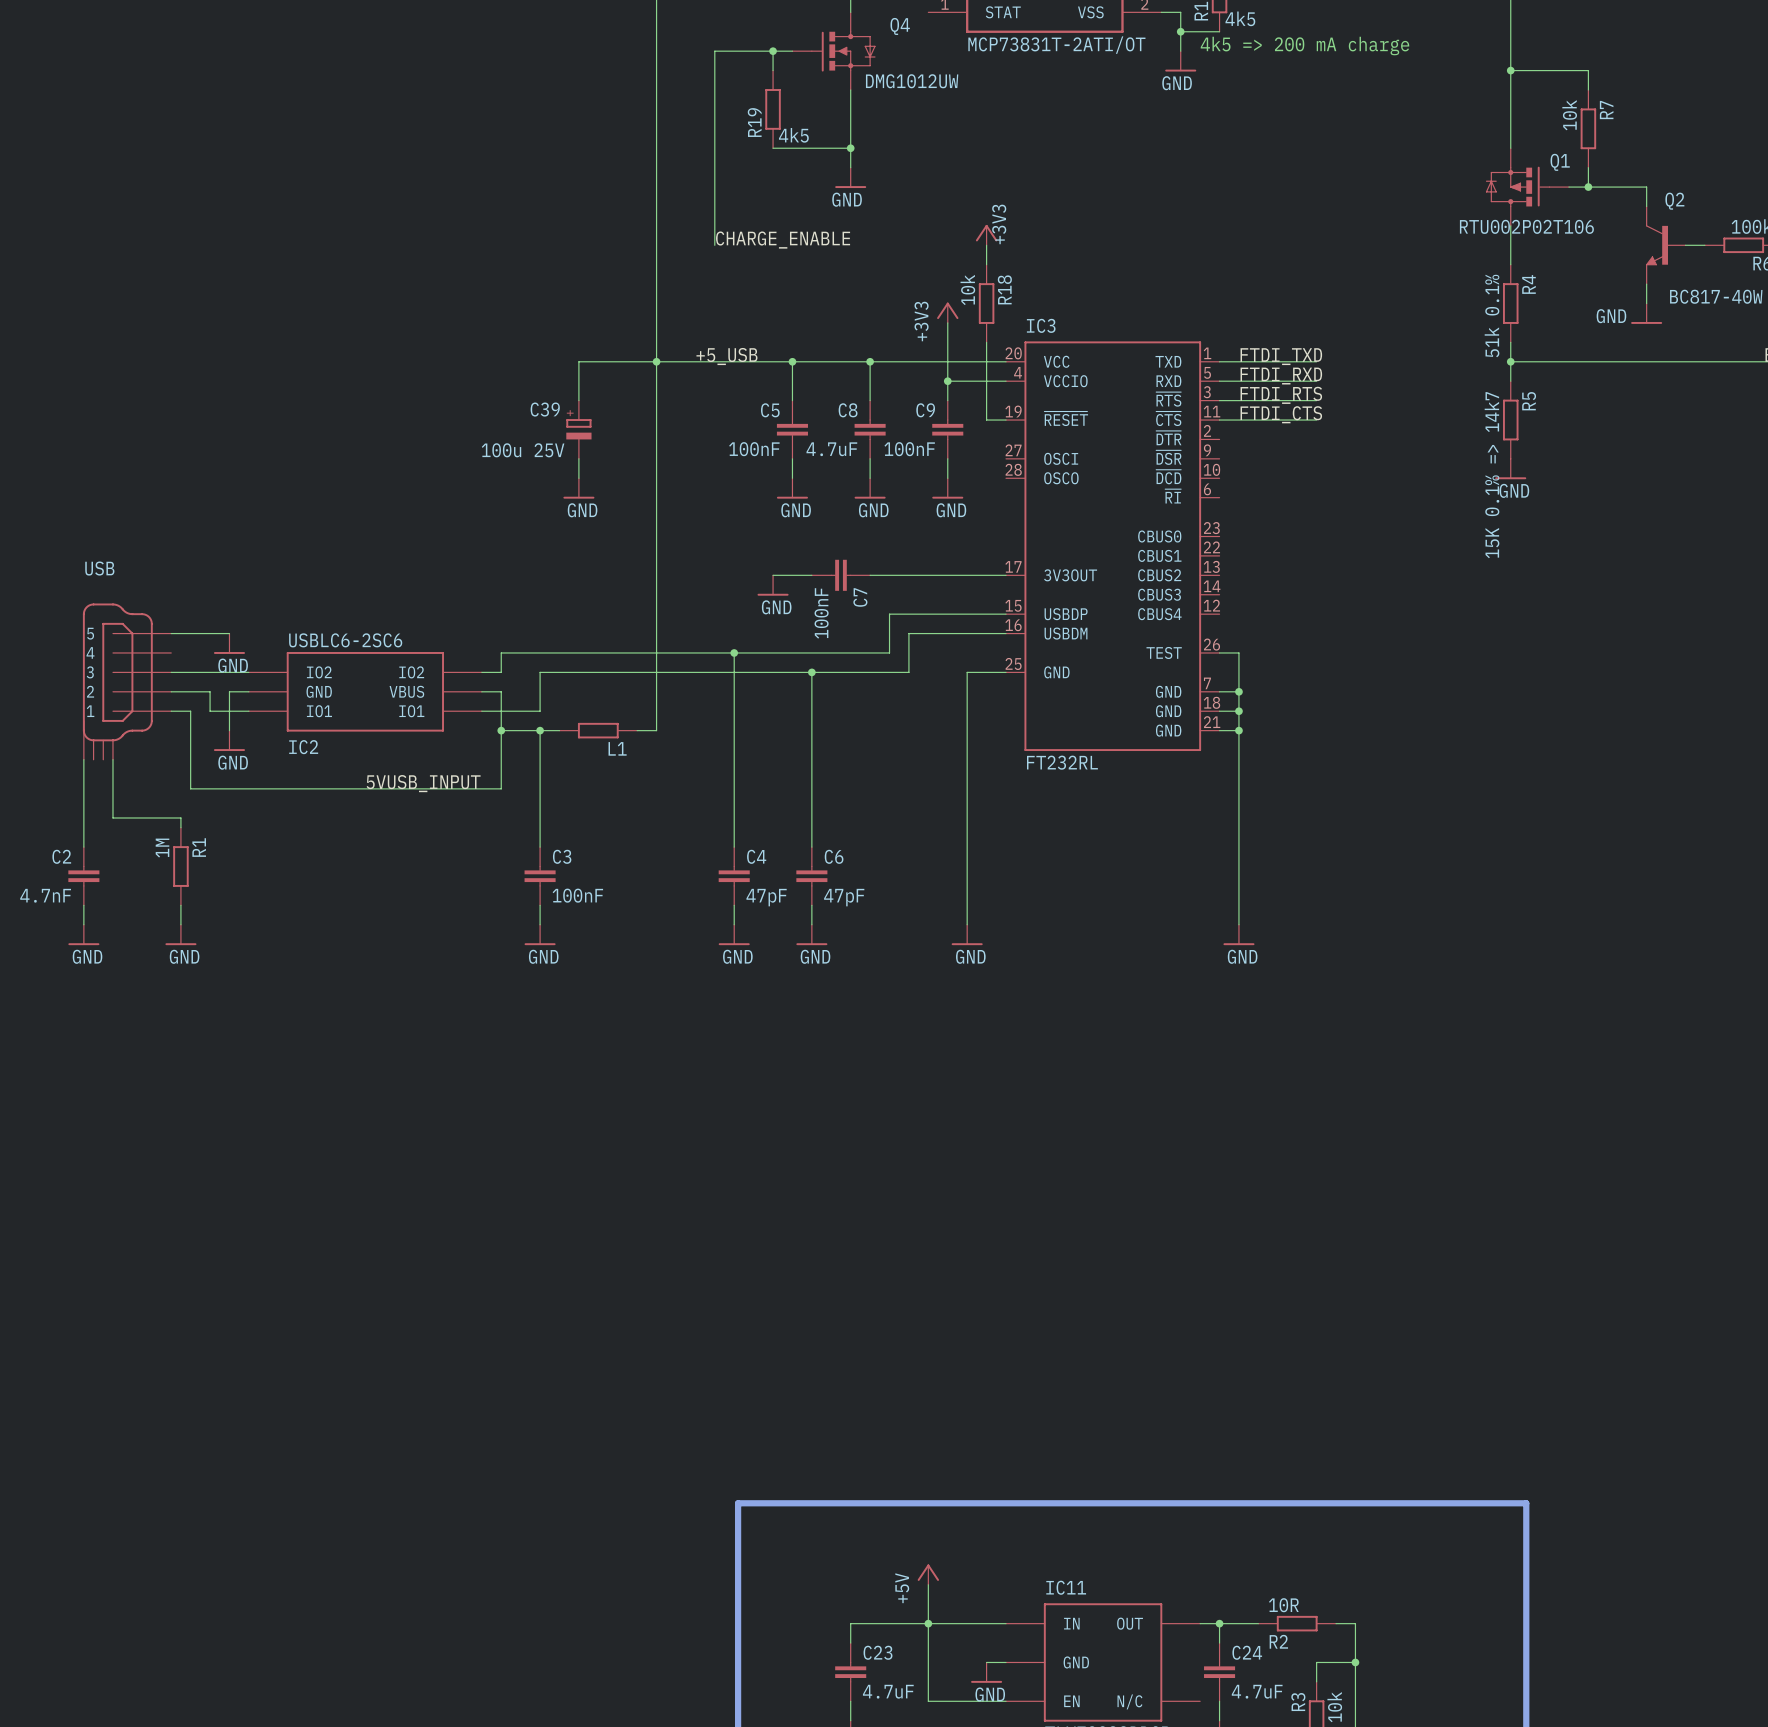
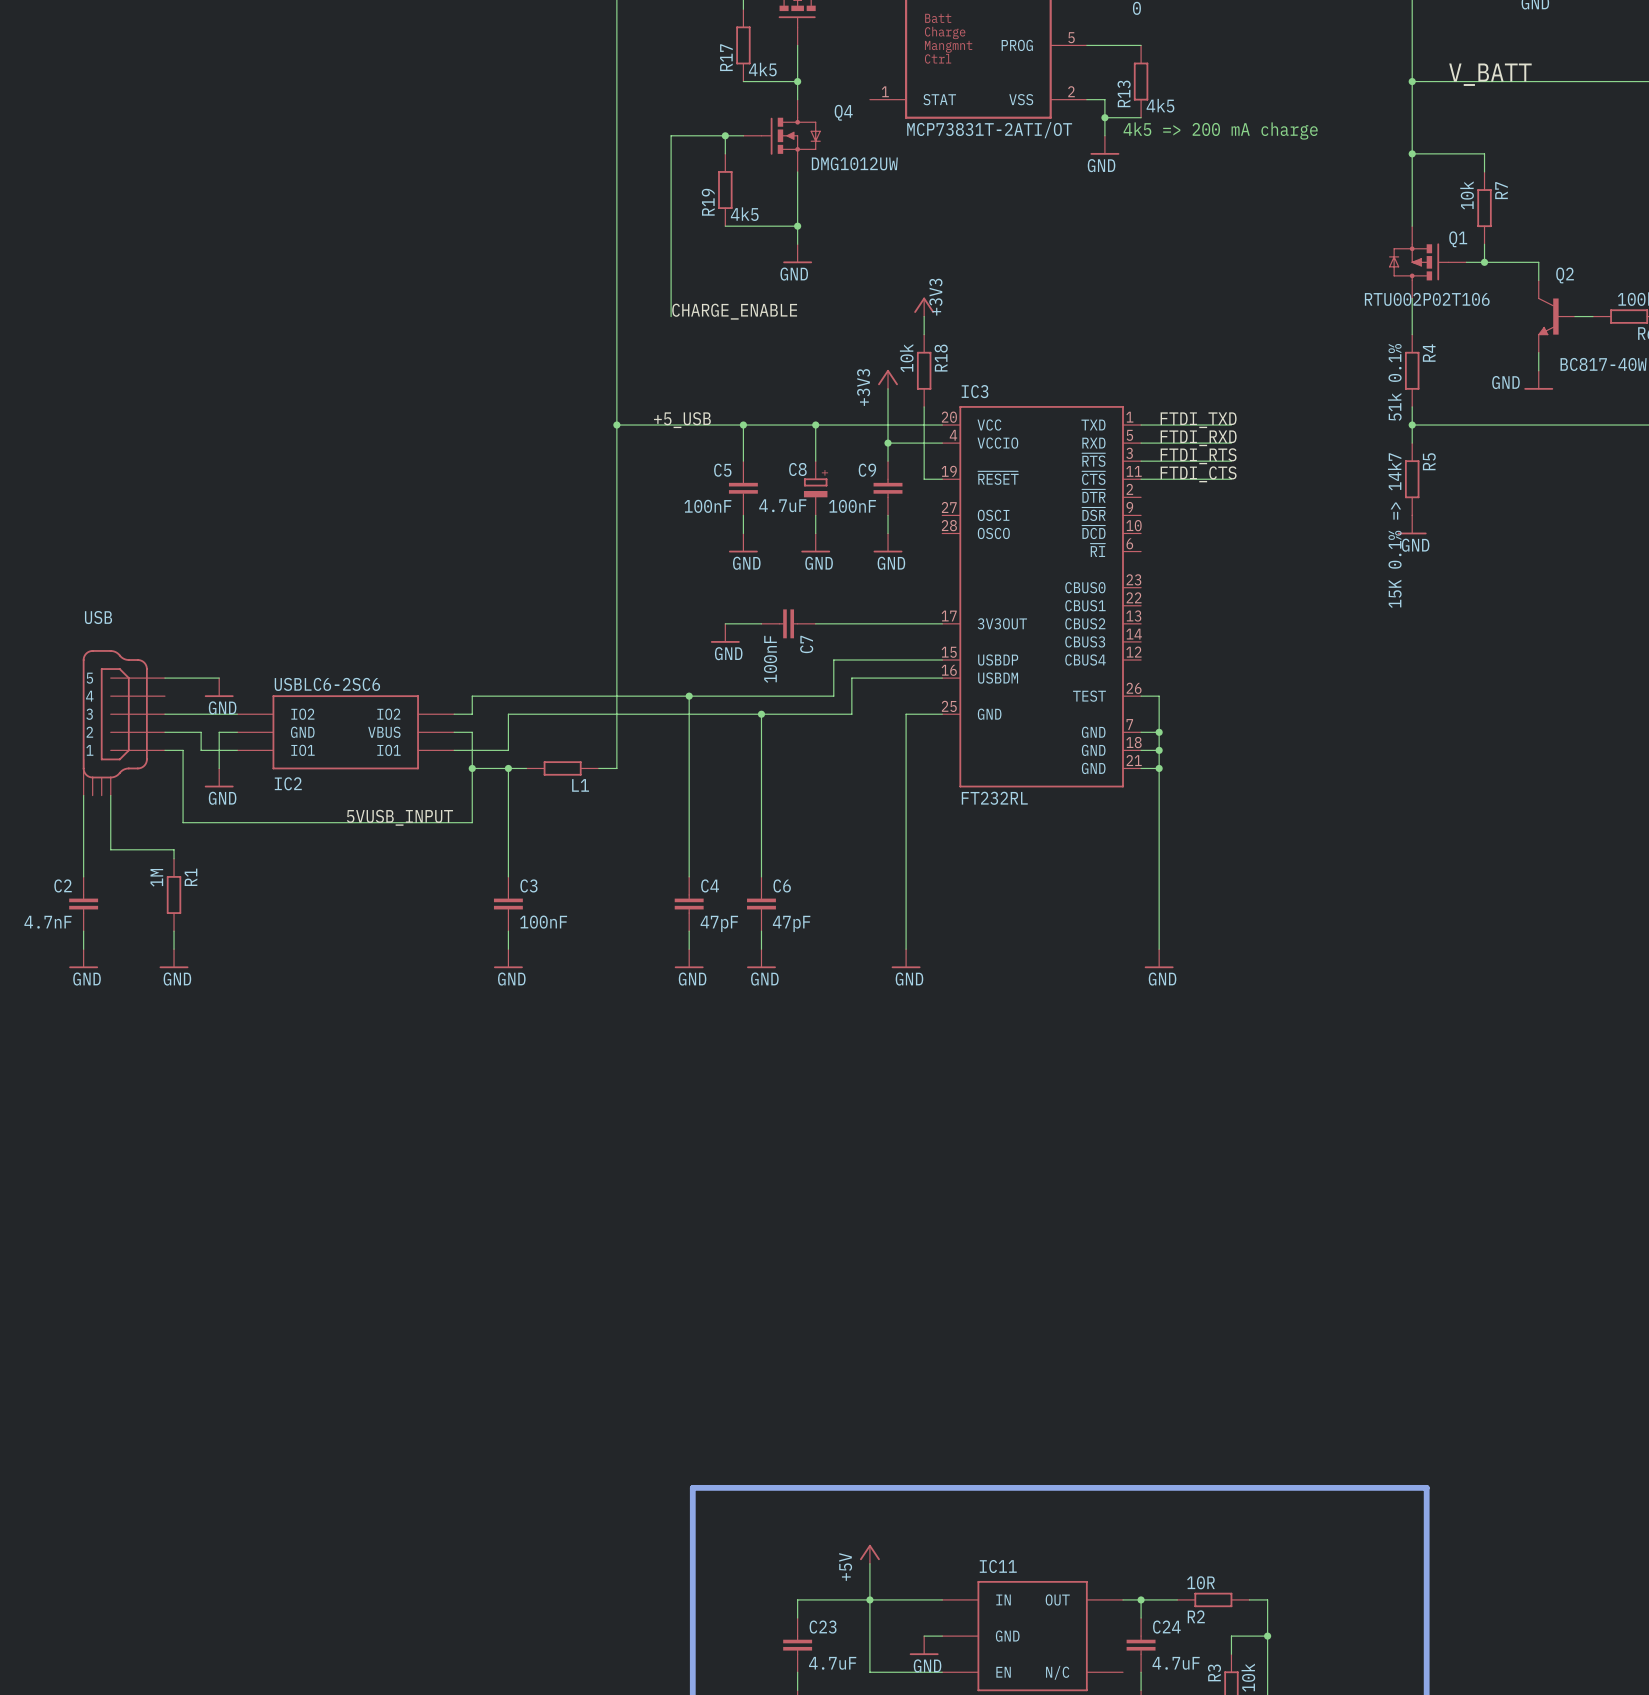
wire: (656, 361) (578, 361) (578, 400) -> none
C8 symbol: [854, 400, 886, 459] -> [803, 461, 828, 516]
C39: 100u 25V (578, 429) -> none
wire: (578, 458) (578, 478) -> none
power symbol: GND (578, 488) -> none

